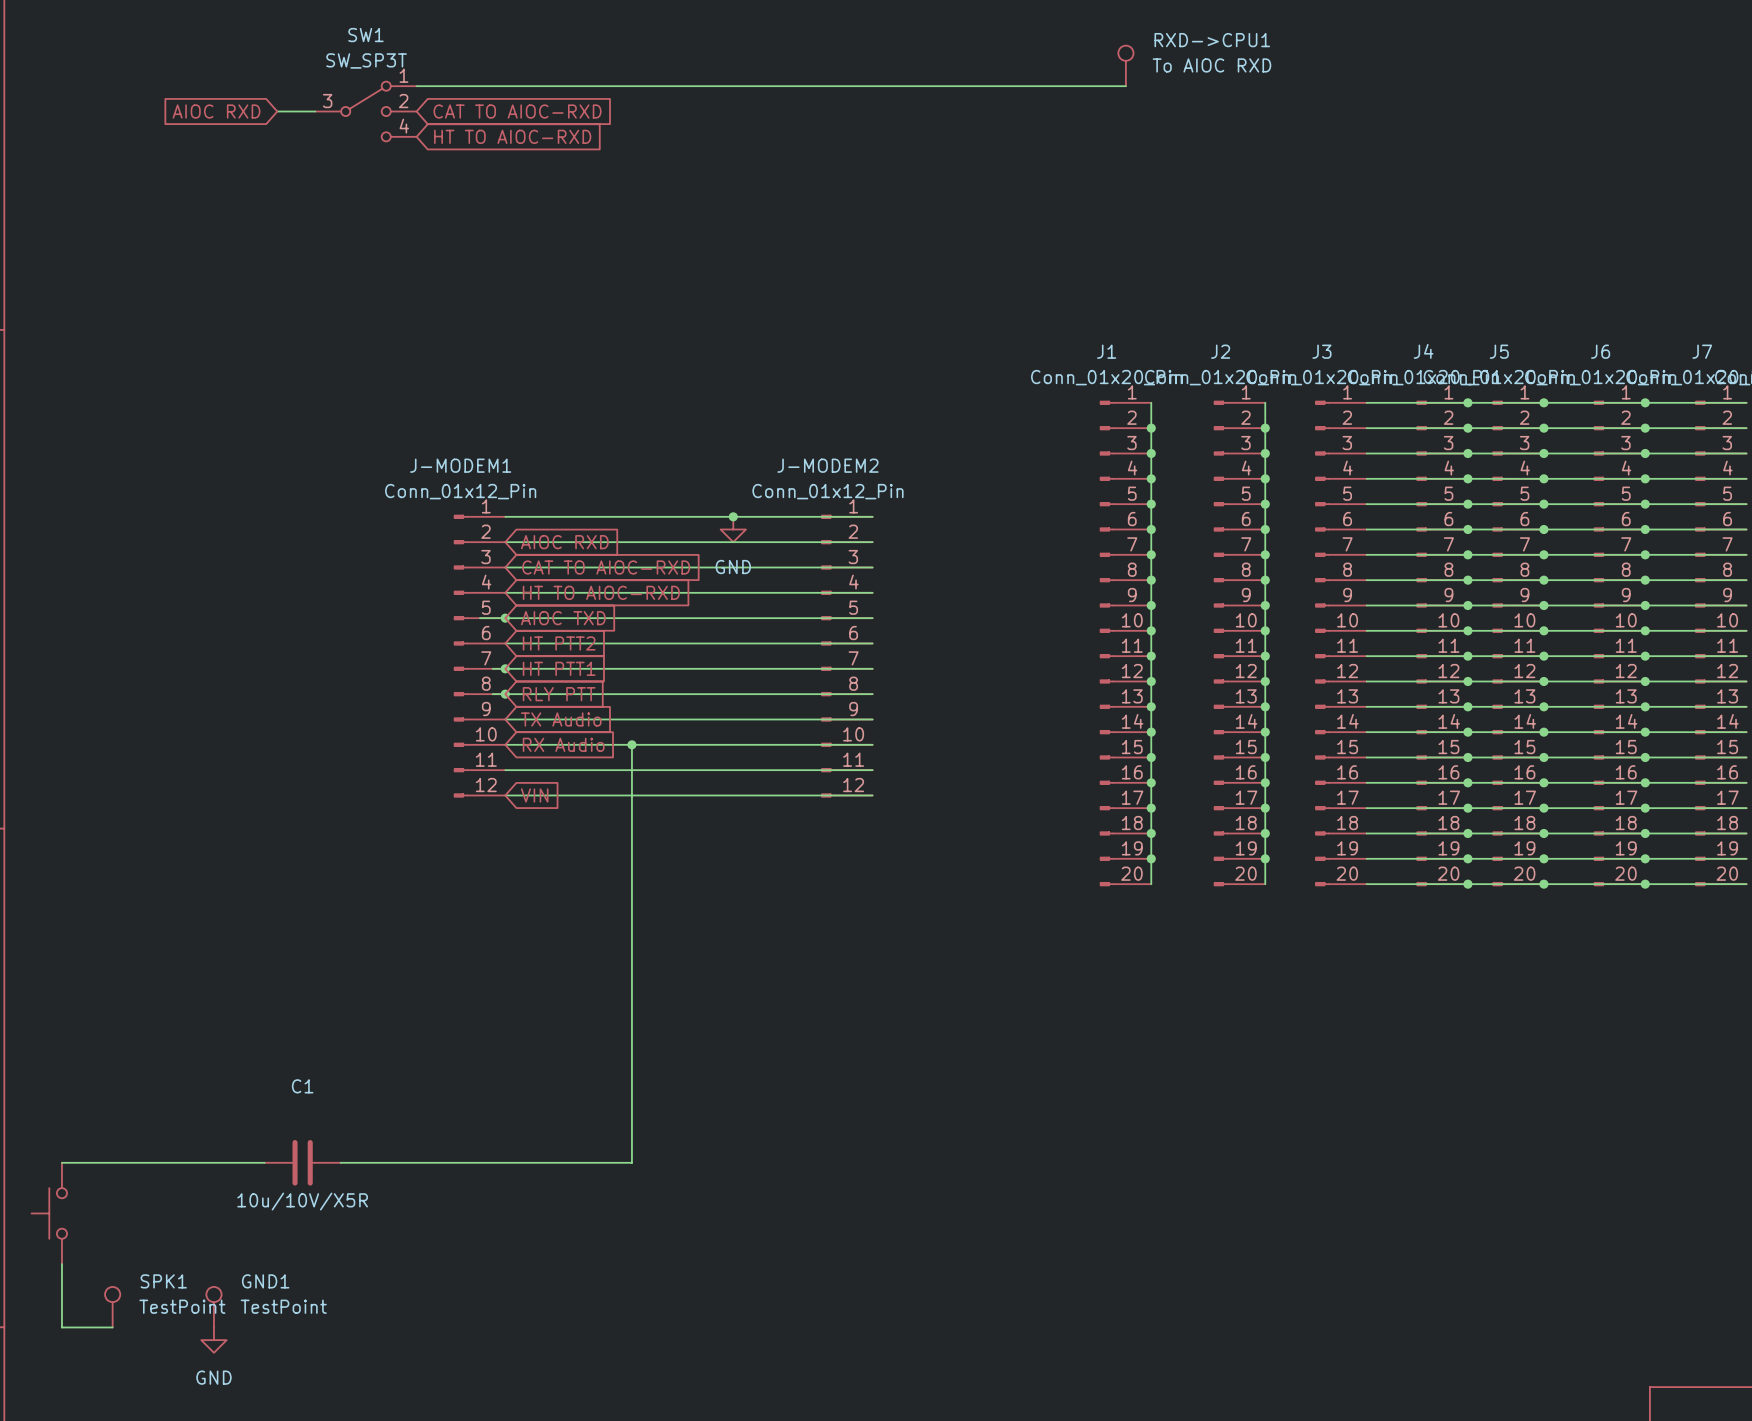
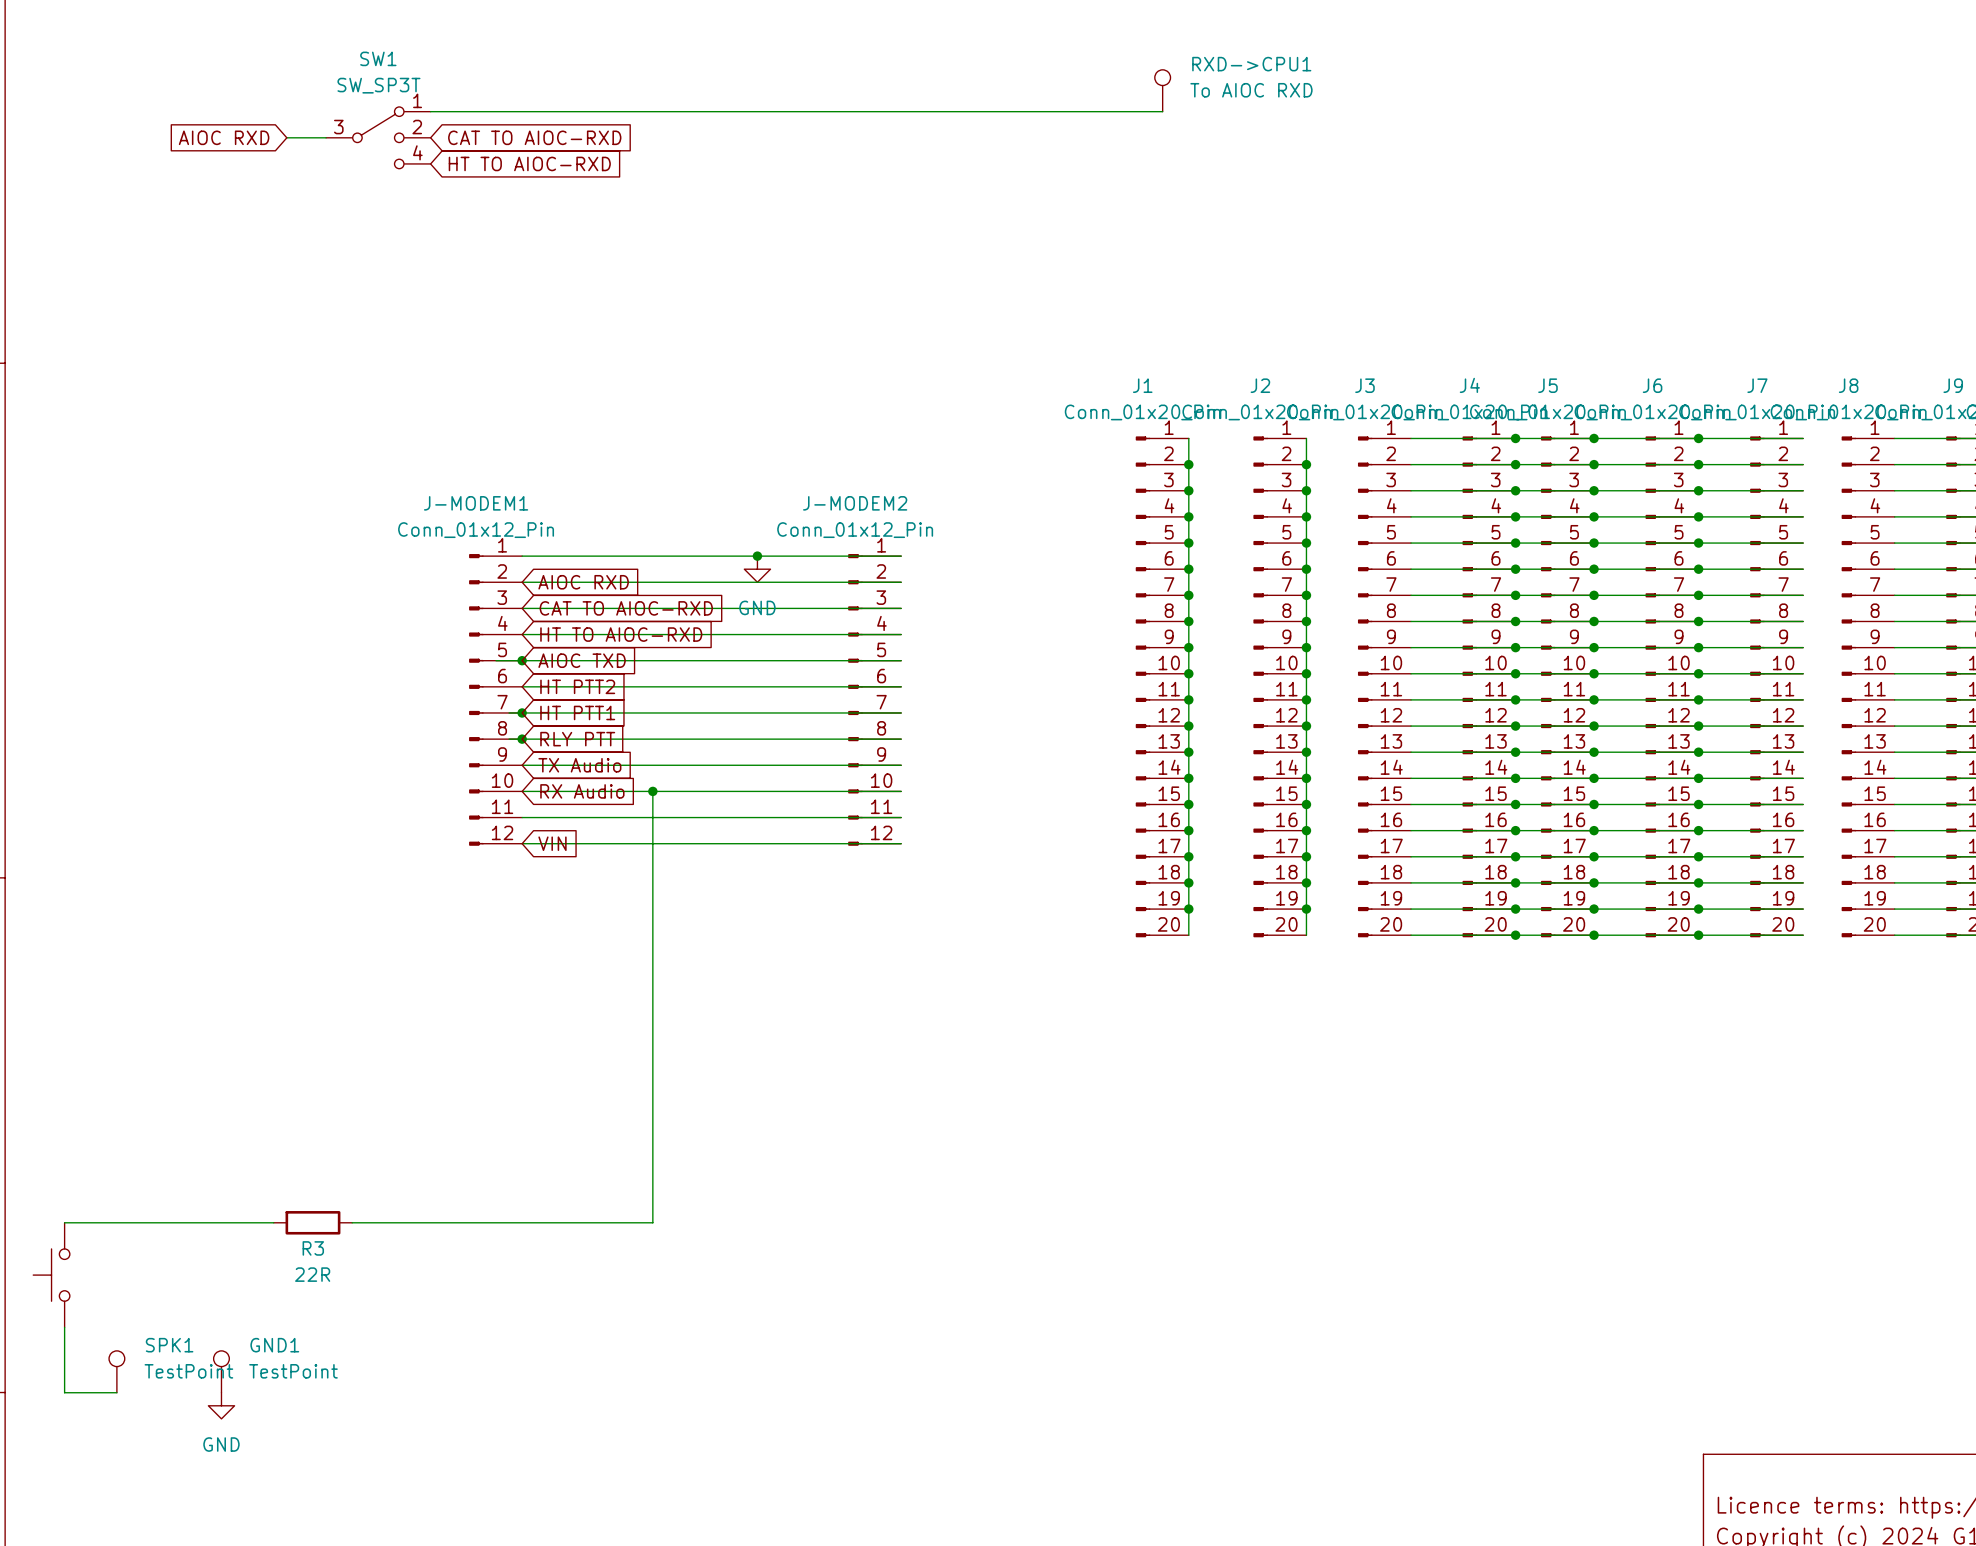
C1: 10u/10V/X5R (302, 1162) -> none
R3: none -> 22R (312, 1222)

